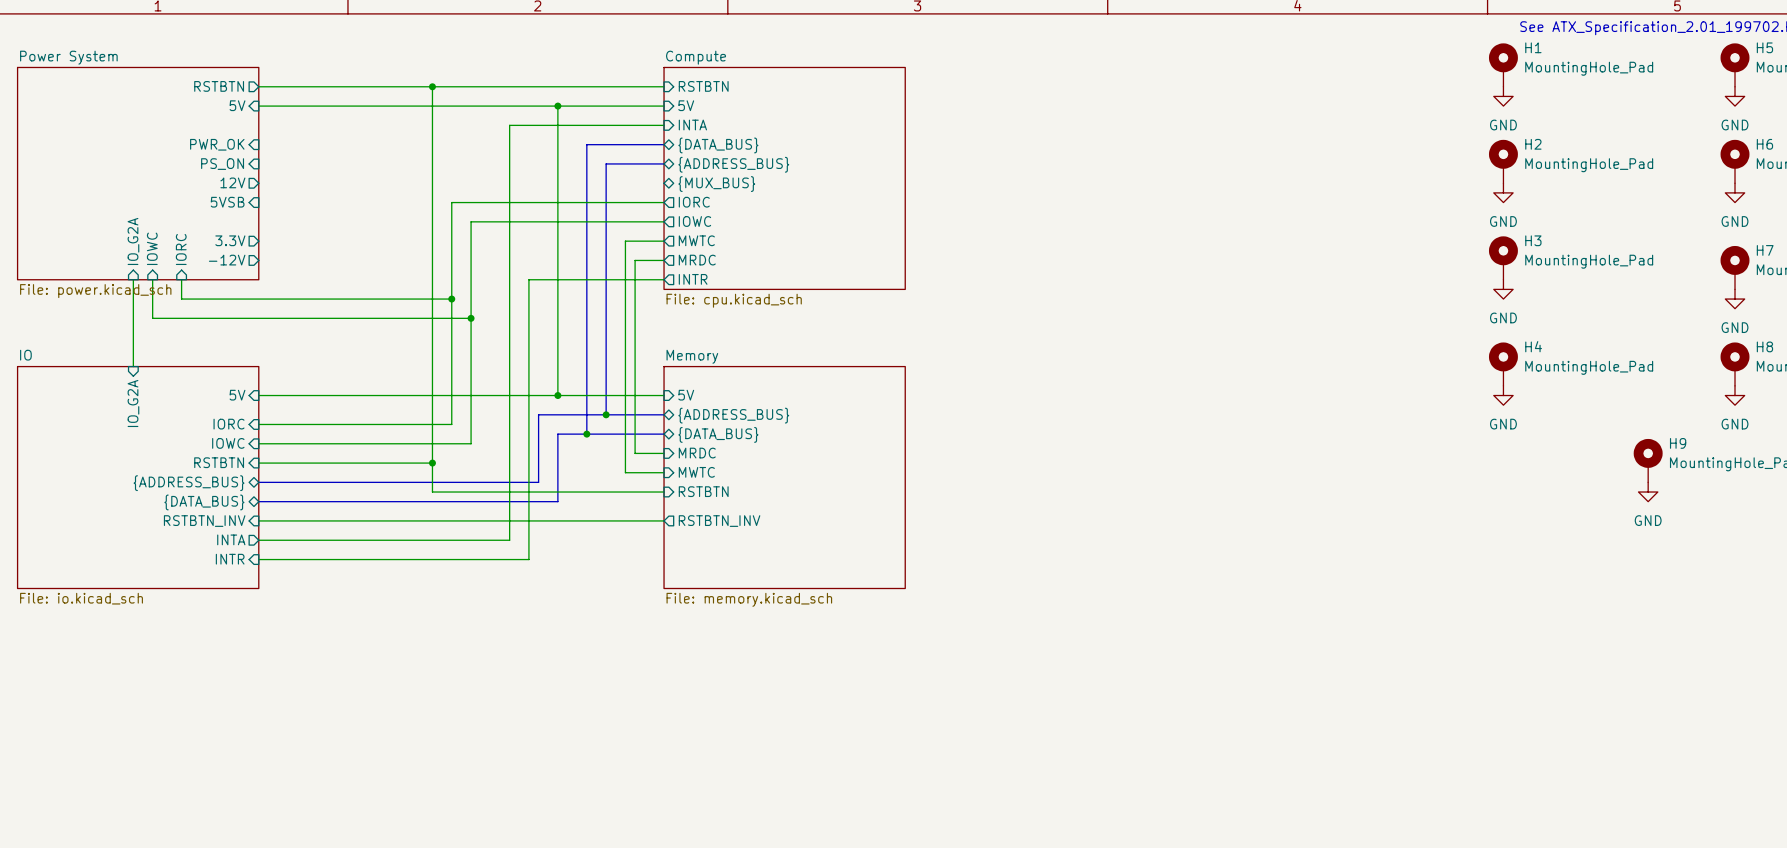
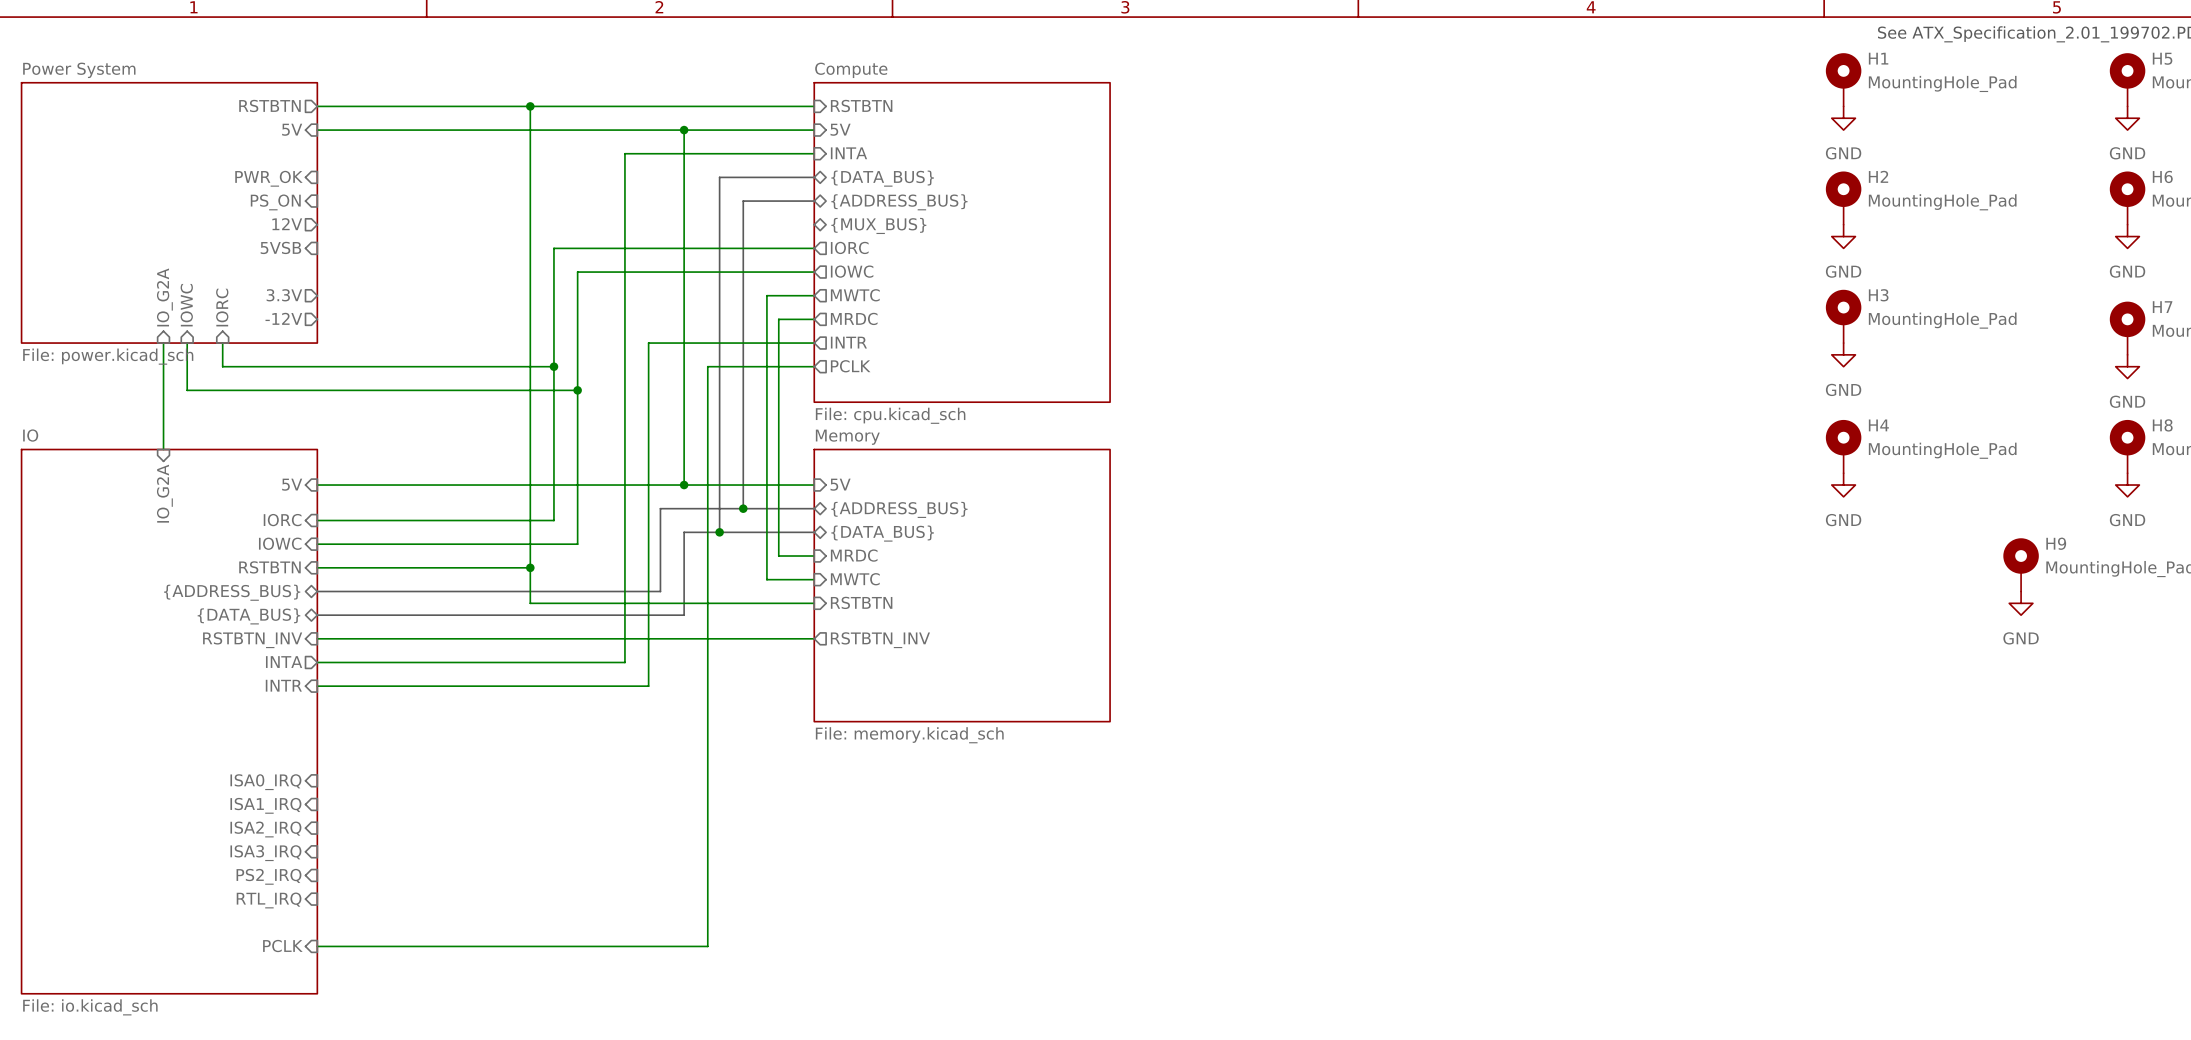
sheet Compute: File: cpu.kicad_sch (784, 178) -> none
sheet Compute: none -> File: cpu.kicad_sch (962, 242)
sheet pin: none -> PCLK (850, 366)
wire: none -> (814, 366) (707, 366) (707, 946) (317, 946)
sheet IO: File: io.kicad_sch (138, 477) -> none
sheet IO: none -> File: io.kicad_sch (169, 721)
sheet pin: none -> ISA0_IRQ (265, 782)
sheet pin: none -> ISA1_IRQ (265, 805)
sheet pin: none -> ISA2_IRQ (265, 829)
sheet pin: none -> ISA3_IRQ (265, 853)
sheet pin: none -> PS2_IRQ (268, 876)
sheet pin: none -> RTL_IRQ (269, 900)
sheet pin: none -> PCLK (282, 946)

